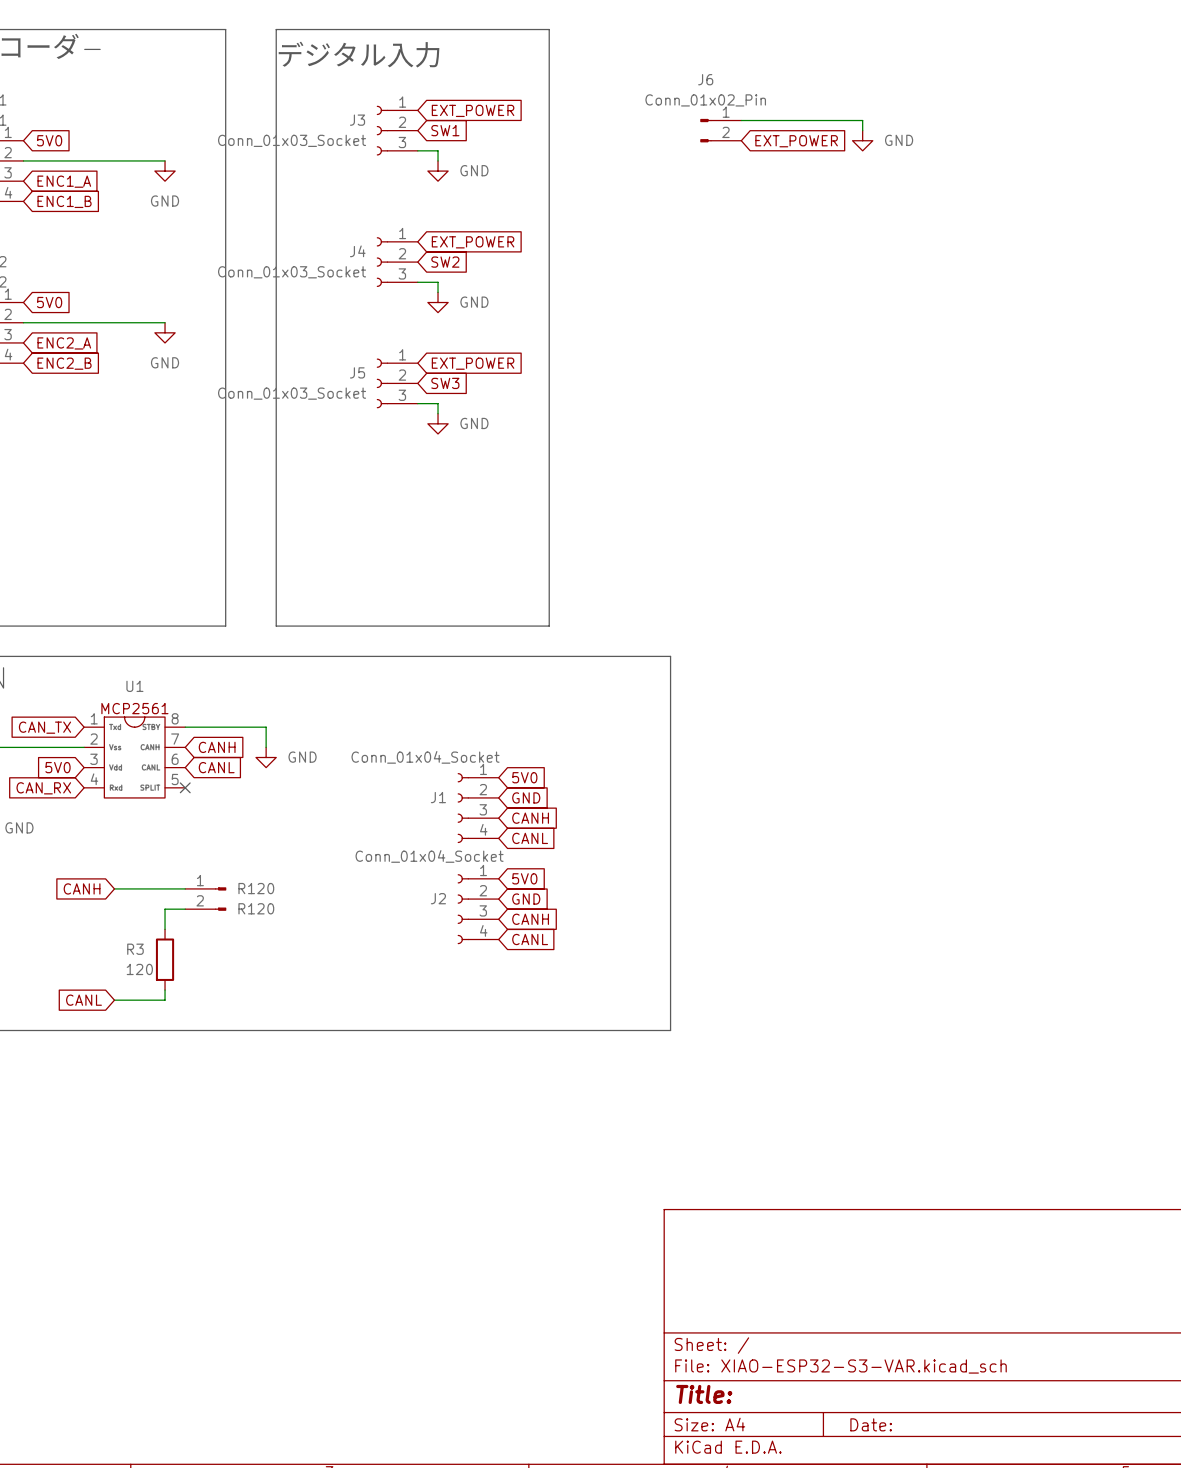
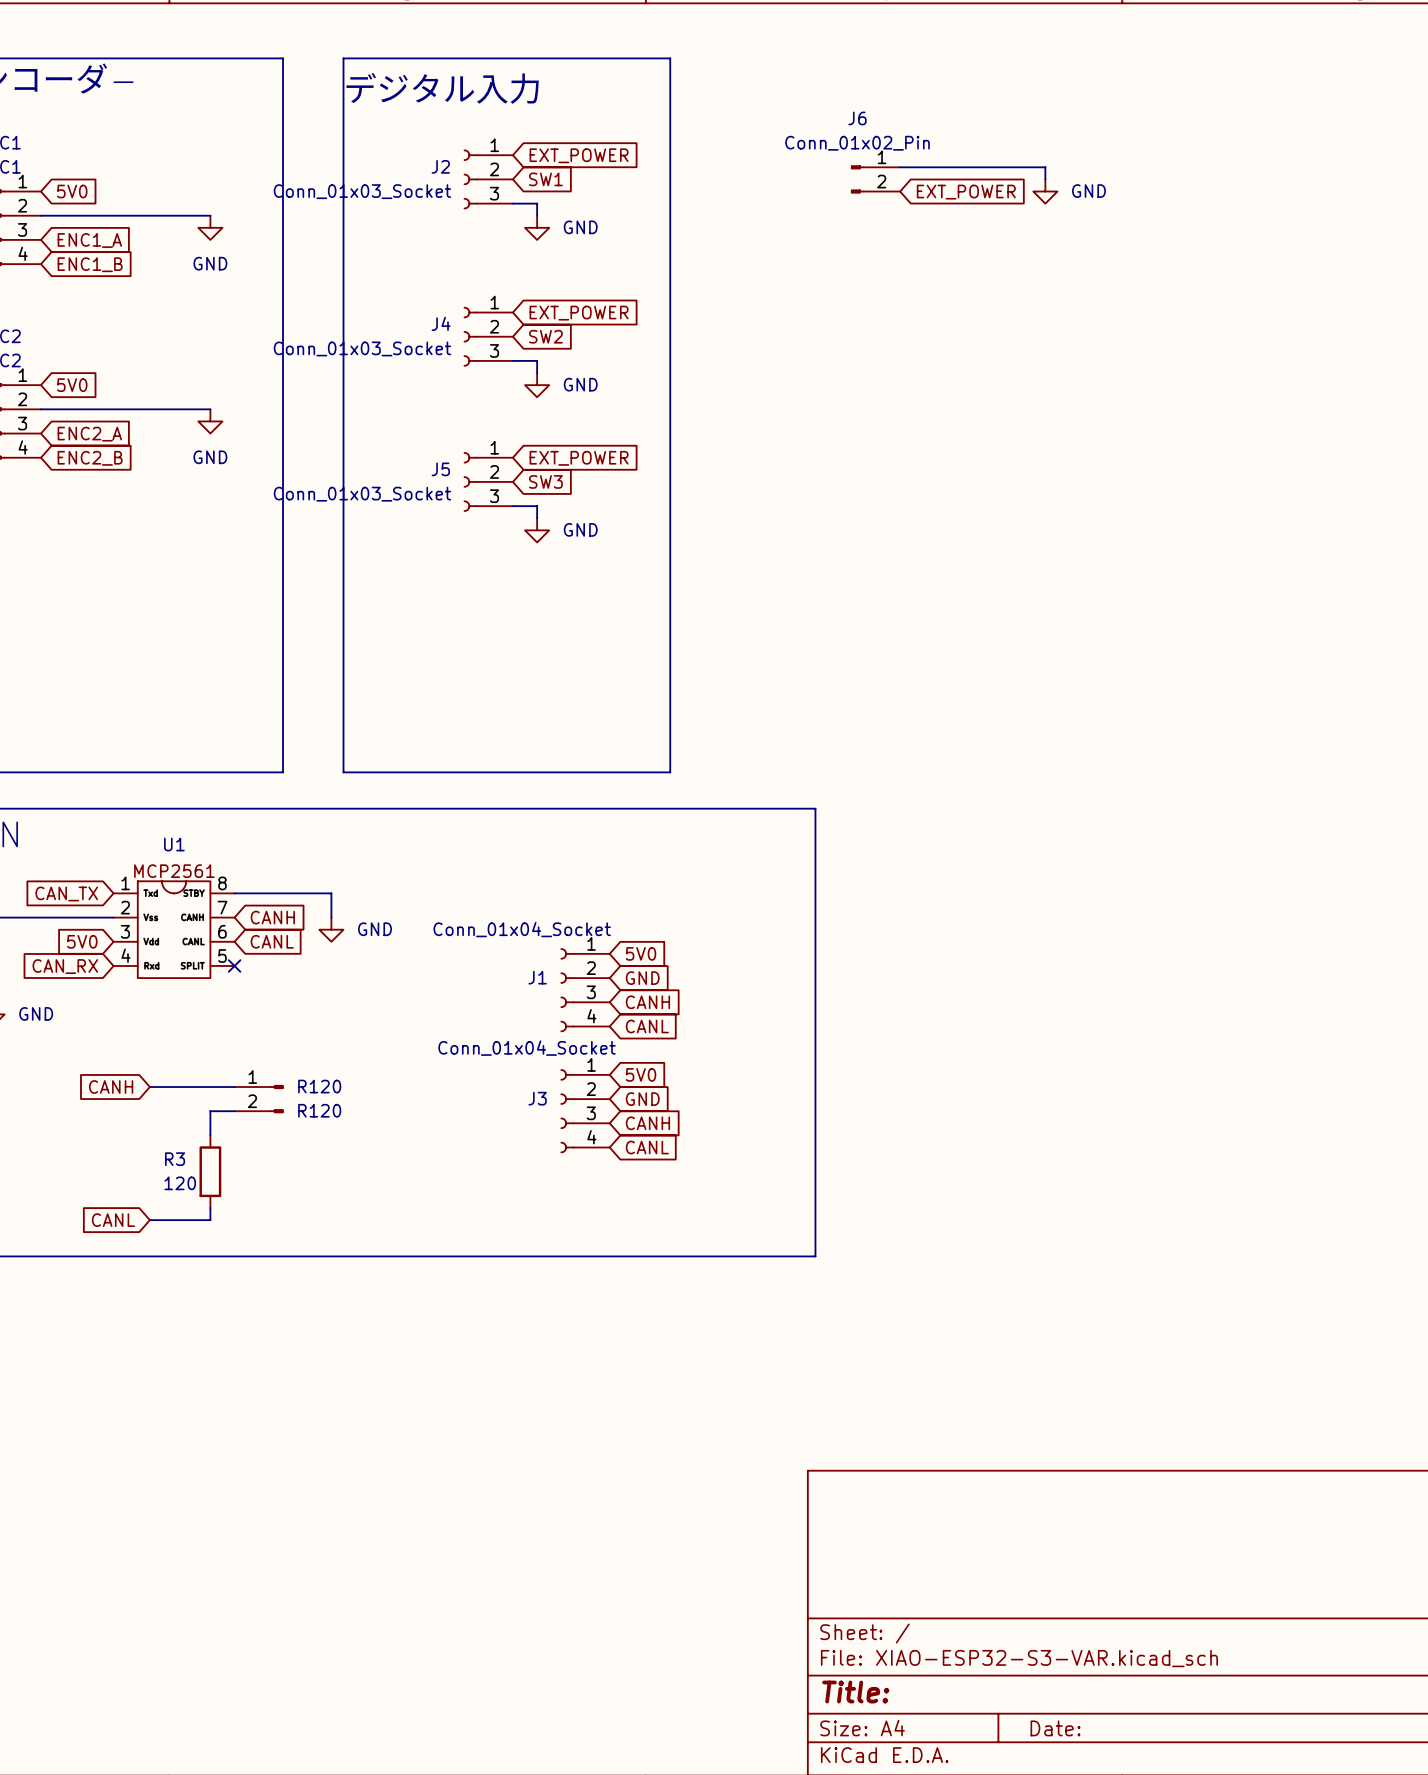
J3 name: J3 (357, 120) -> J2 (440, 166)
J2 name: J2 (438, 898) -> J3 (537, 1098)

